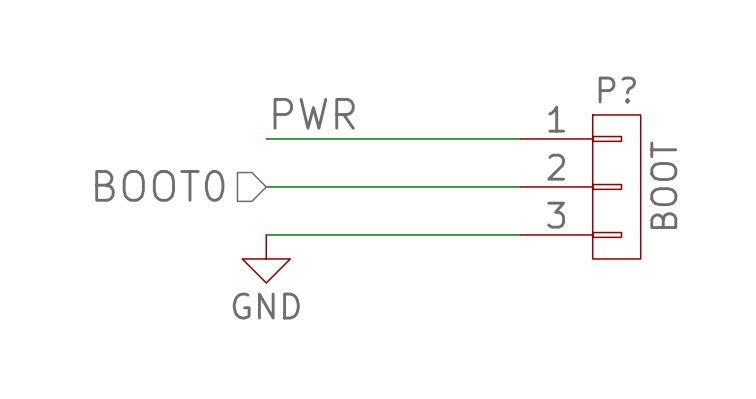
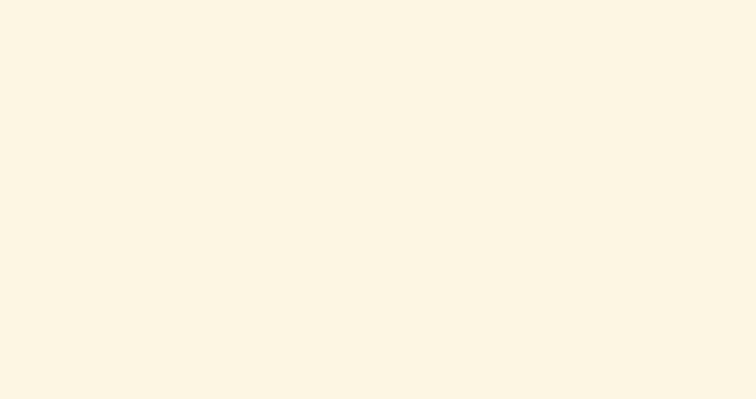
label: PWR (314, 113) -> none
wire: (266, 138) (520, 138) -> none
hierarchical label: BOOT0 (159, 185) -> none
wire: (266, 186) (520, 186) -> none
P?: BOOT (580, 186) -> none
wire: (266, 234) (520, 234) -> none
power symbol: GND (266, 258) -> none

